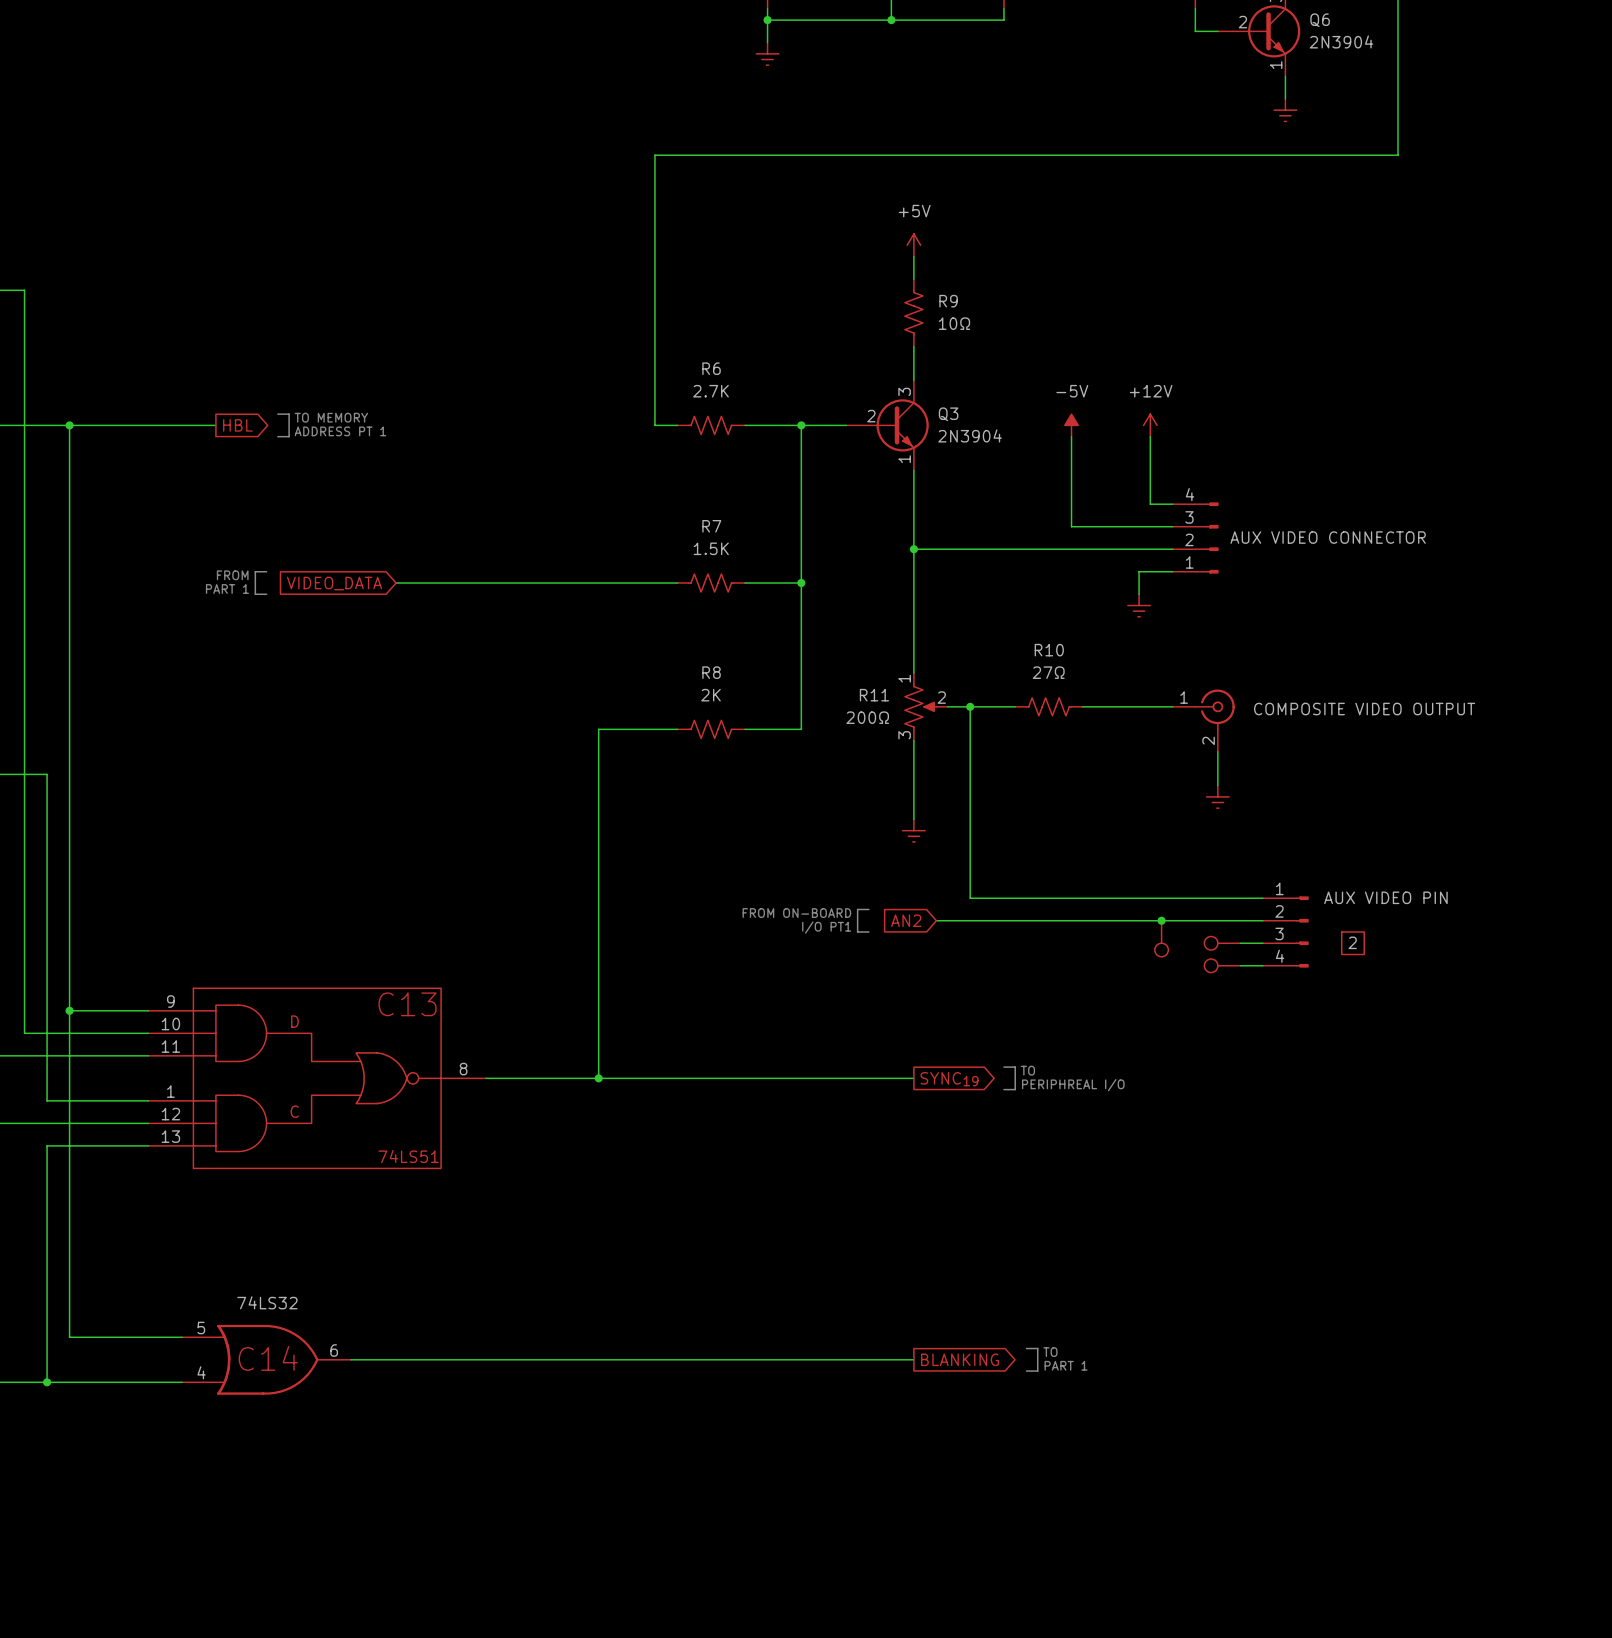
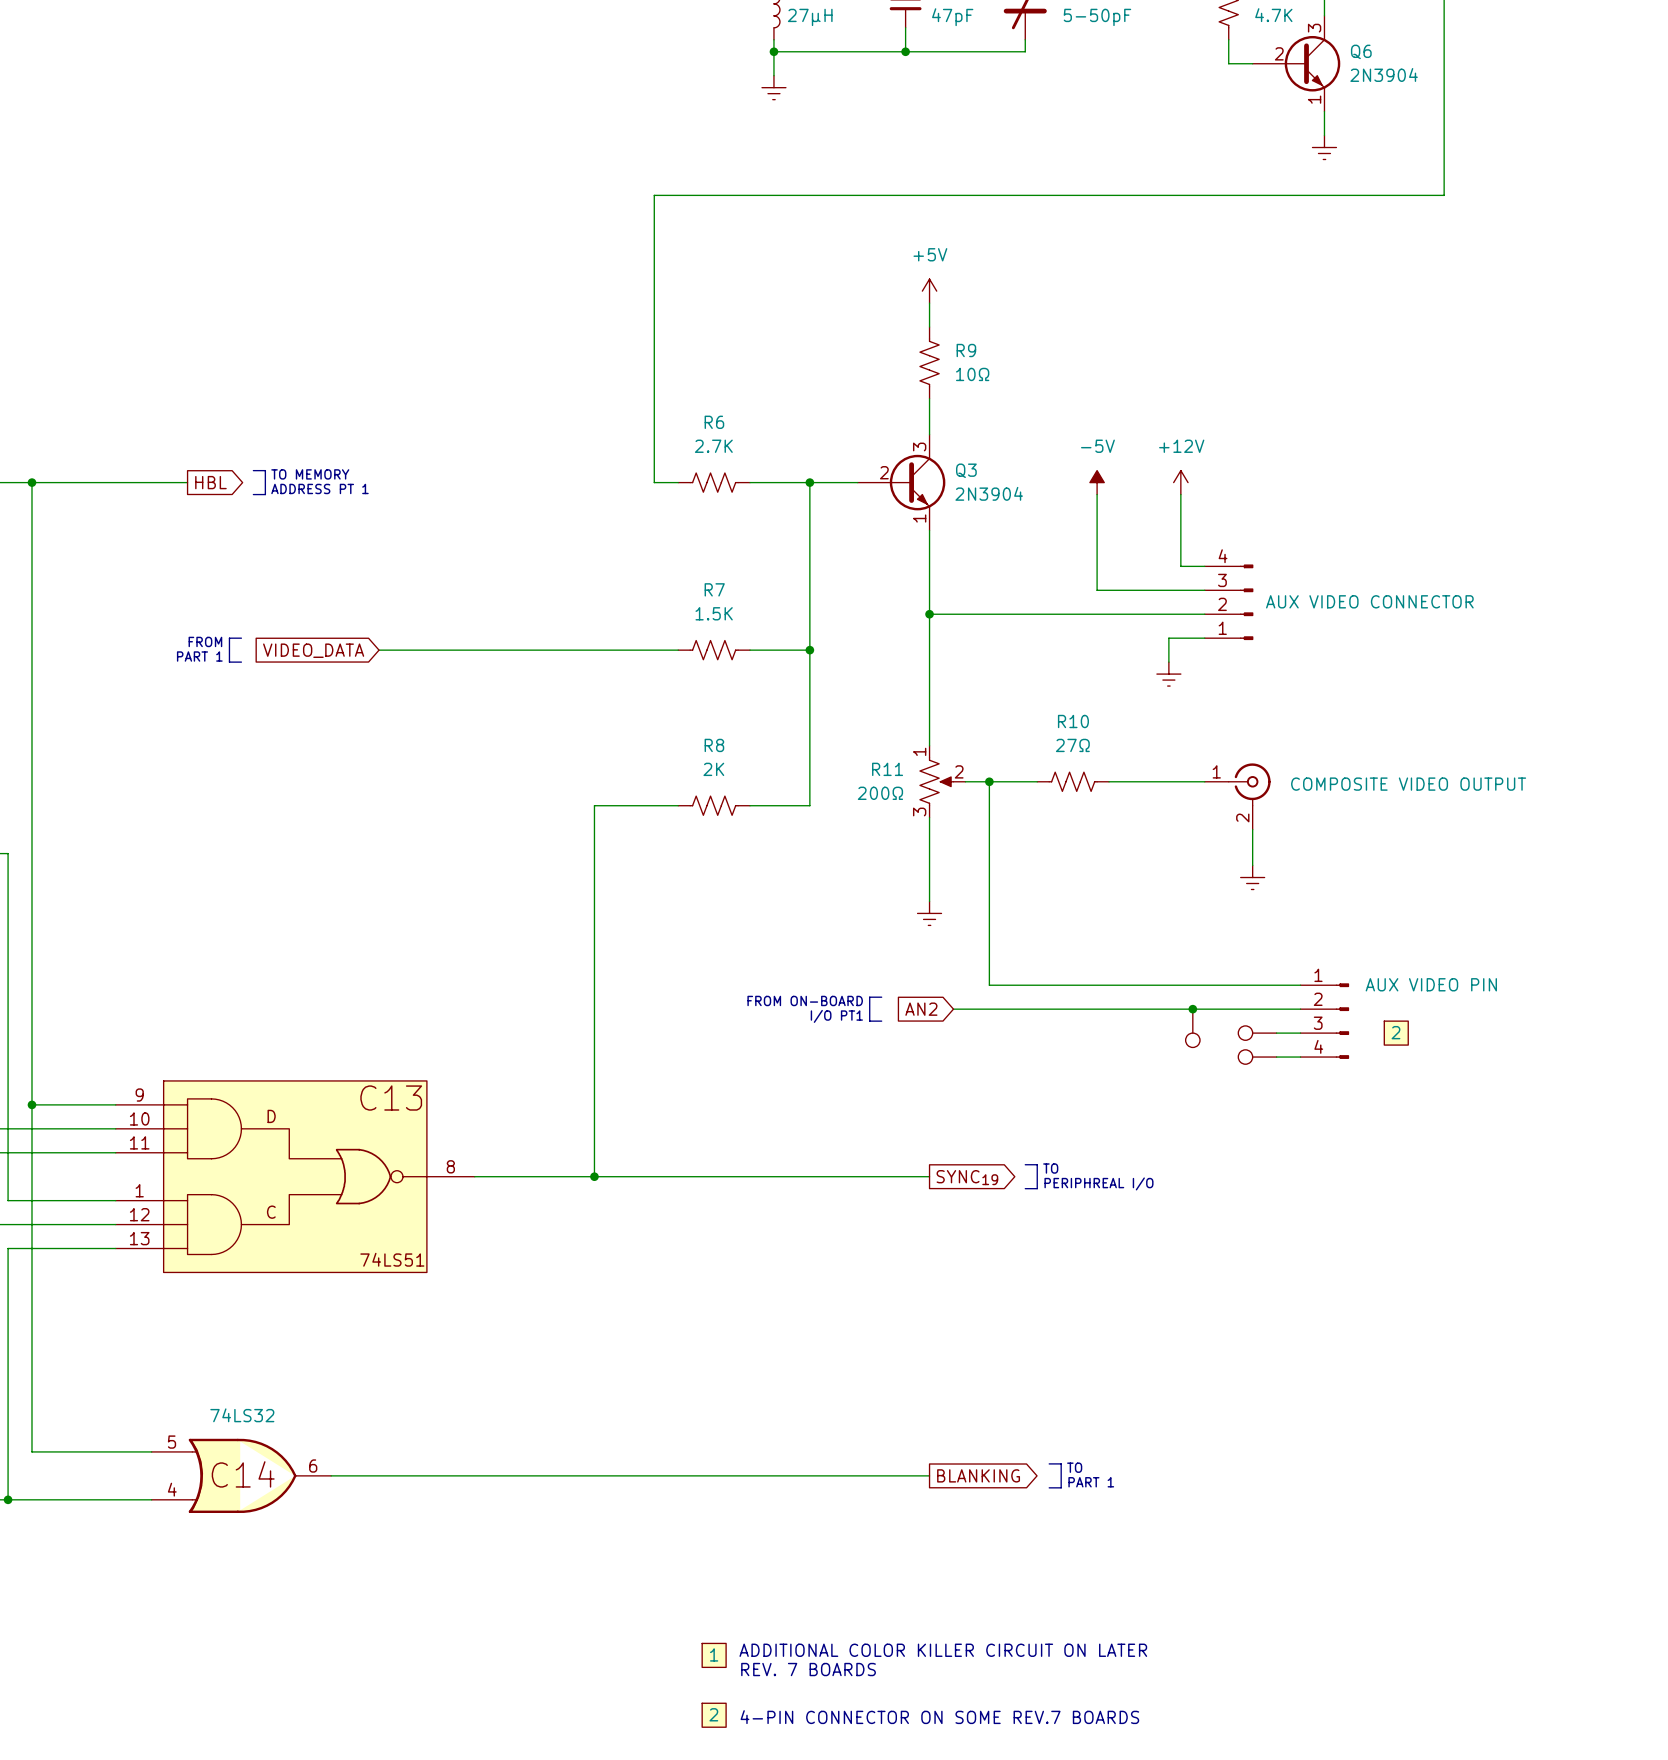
text: none -> ADDITIONAL COLOR KILLER CIRCUIT ON LATER (943, 1650)
part: none -> 1 (714, 1655)
text: none -> REV. 7 BOARDS (808, 1669)
part: none -> 2 (714, 1715)
text: none -> 4-PIN CONNECTOR ON SOME REV.7 BOARDS (939, 1717)

